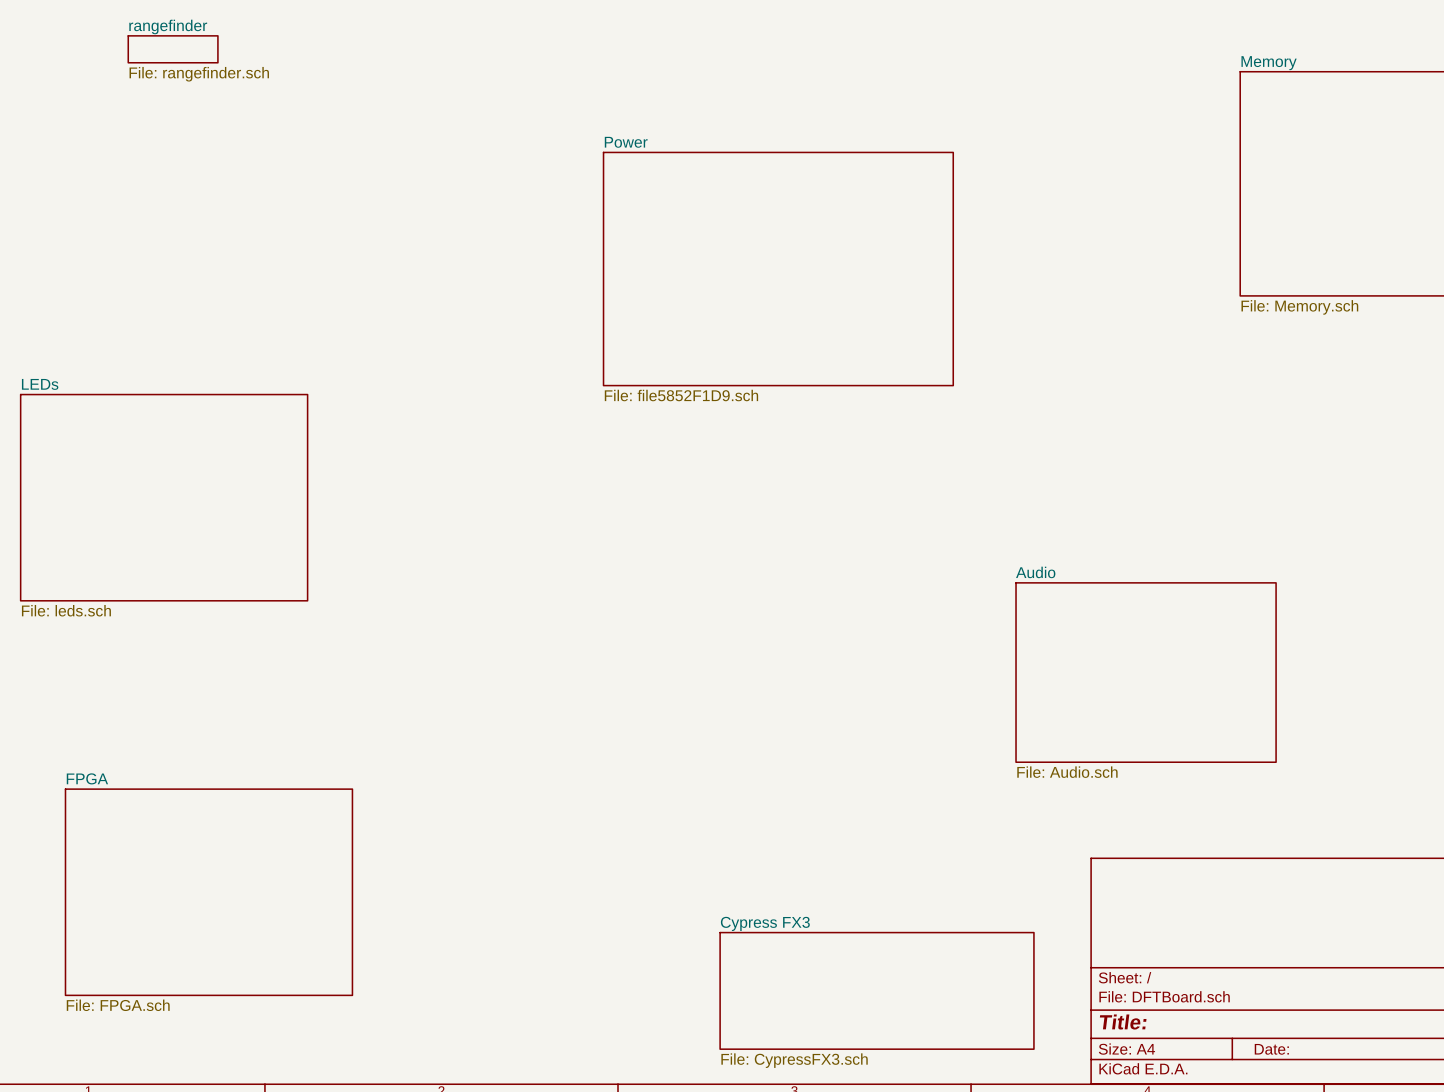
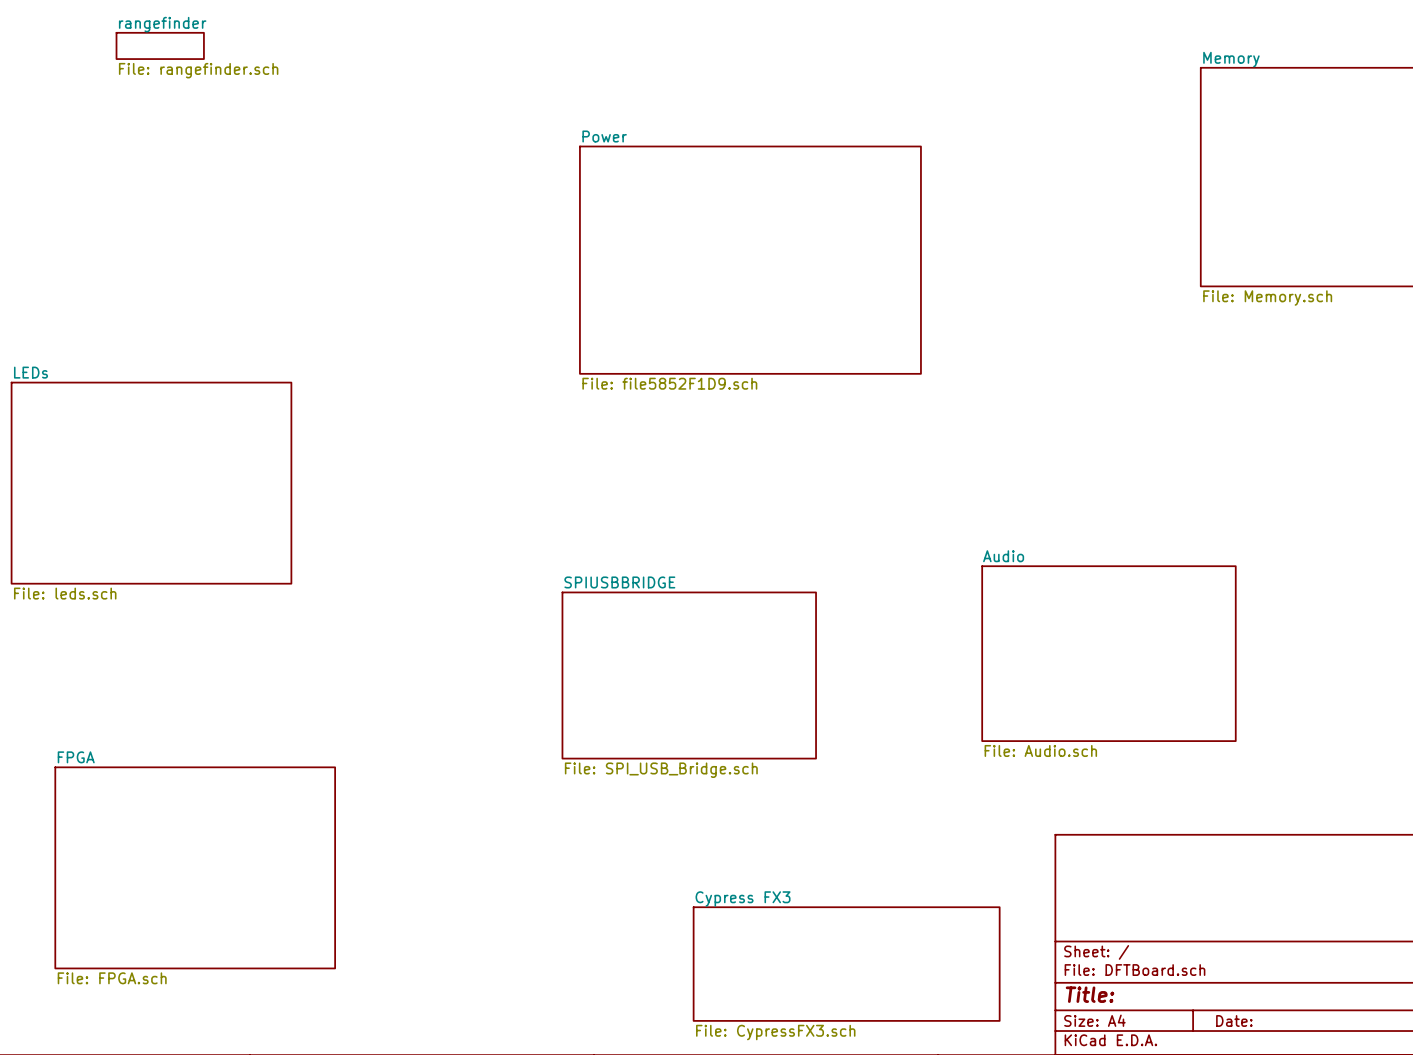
sheet SPIUSBBRIDGE: none -> File: SPI_USB_Bridge.sch (689, 675)

